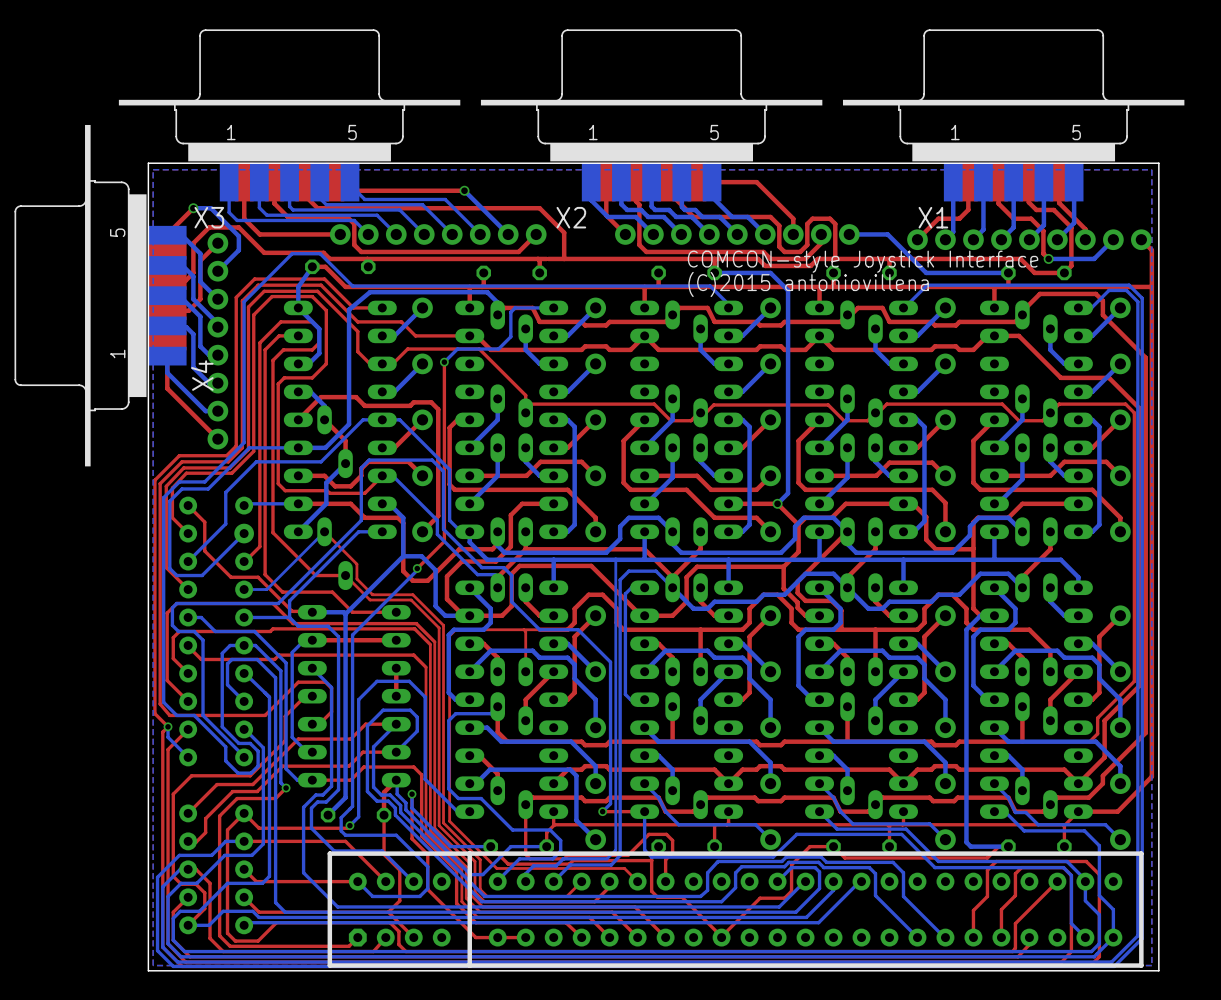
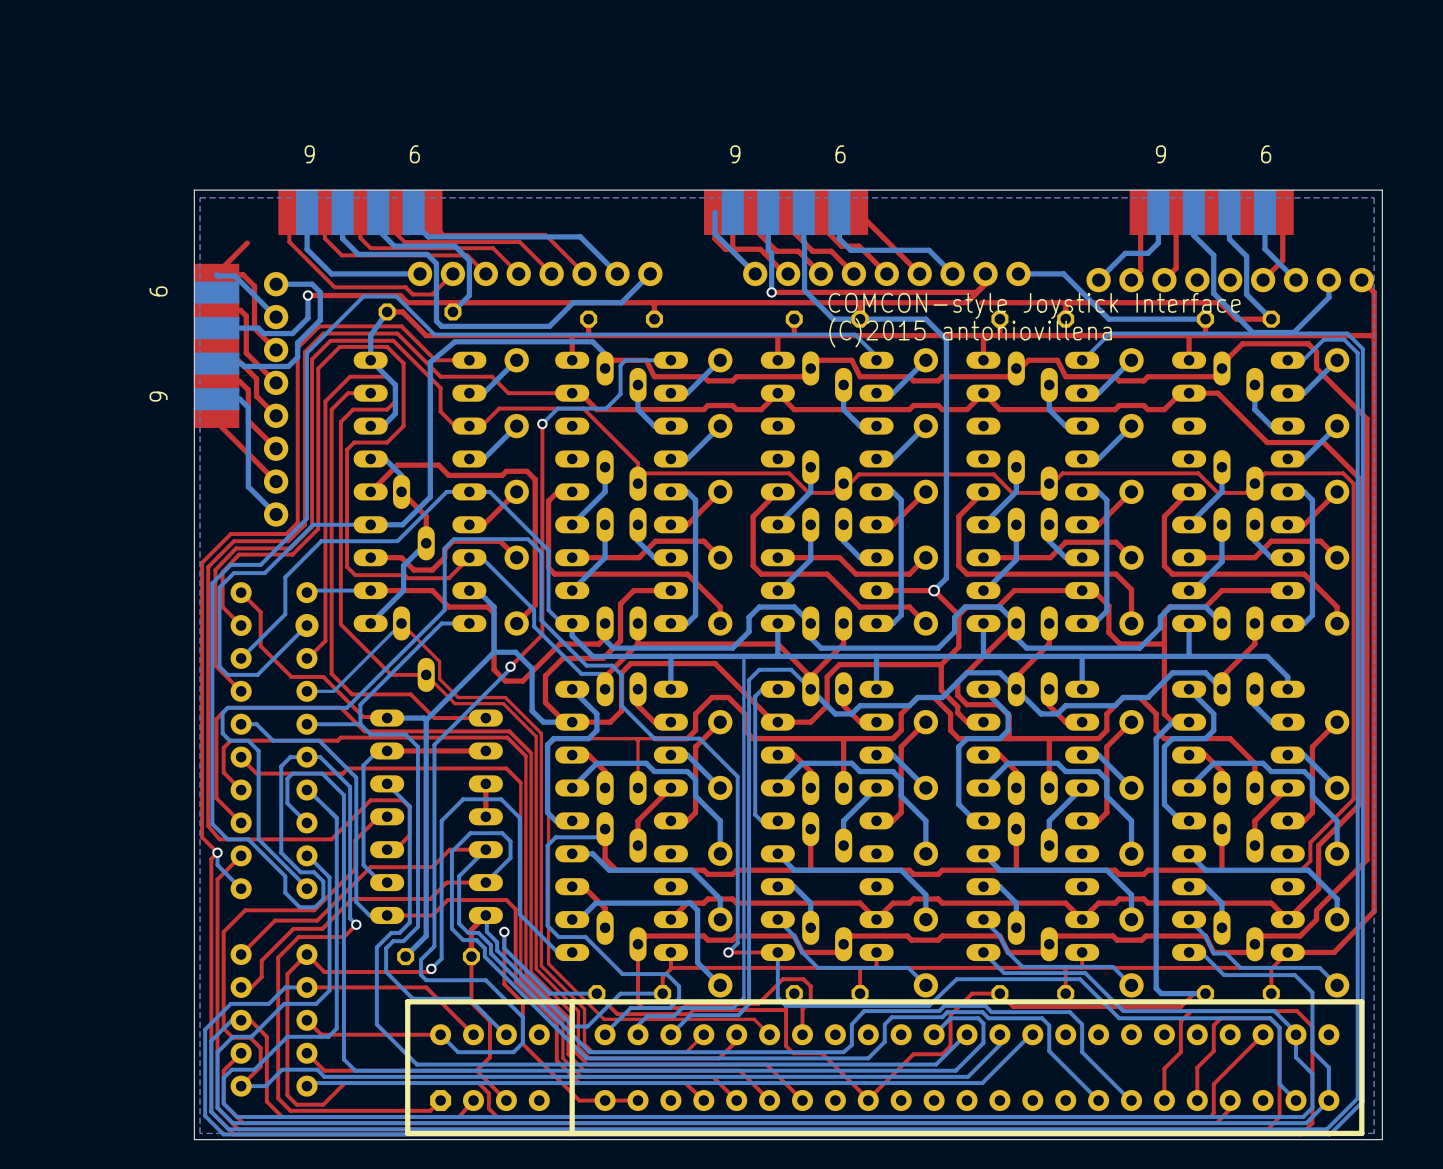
X3 side: bottom (289, 115) -> top (360, 212)
X2 side: bottom (651, 115) -> top (786, 212)
X1 side: bottom (1013, 115) -> top (1211, 212)
bottom track: (229, 182) (229, 212) (237, 220) (354, 220) (368, 234) -> none
top track: none -> (289, 212) (289, 241) (334, 287) (405, 287) (412, 294) (432, 294) (452, 273)
bottom track: none -> (307, 212) (307, 249) (331, 273) (420, 273)
top track: (244, 182) (244, 218) (259, 234) (340, 234) -> none
bottom track: (259, 182) (259, 207) (266, 215) (377, 215) (396, 234) -> none
top track: none -> (324, 212) (324, 238) (341, 255) (467, 255) (485, 273)
bottom track: none -> (342, 212) (342, 238) (358, 254) (427, 254) (436, 263) (436, 321) (441, 326) (549, 326) (573, 302) (621, 302) (650, 273)
top track: (274, 182) (274, 203) (287, 216) (347, 216) (354, 223) (354, 244) (361, 251) (518, 251) (536, 234) -> none
bottom track: (289, 182) (289, 206) (293, 209) (399, 209) (424, 234) -> none
top track: none -> (360, 212) (360, 237) (370, 248) (493, 248) (518, 273)
bottom track: none -> (378, 212) (378, 229) (394, 246) (455, 246) (469, 260) (469, 295) (452, 311)
top track: (304, 182) (304, 195) (317, 208) (539, 208) (564, 232) (564, 258) -> none
bottom track: (319, 182) (319, 198) (326, 204) (422, 204) (452, 234) -> none
top track: none -> (395, 212) (395, 233) (404, 242) (519, 242) (551, 273)
top track: (334, 182) (342, 182) (350, 190) (464, 190) -> none
bottom track: (350, 182) (350, 184) (364, 199) (445, 199) (480, 234) -> none
top track: none -> (431, 212) (431, 222) (443, 234) (545, 234) (584, 273)
top track: none -> (714, 212) (714, 238) (725, 249) (760, 249) (785, 273) (788, 273)
bottom track: (621, 182) (621, 204) (627, 209) (641, 209) (648, 216) (663, 216) (681, 234) -> none
top track: none -> (750, 212) (750, 225) (776, 251) (798, 251) (821, 273)
bottom track: none -> (768, 212) (768, 249) (771, 253) (771, 292)
top track: (636, 182) (635, 201) (639, 204) (639, 244) (646, 251) (763, 251) (770, 258) -> none
bottom track: (651, 182) (651, 206) (655, 209) (669, 209) (676, 216) (691, 216) (709, 234) -> none
top track: none -> (786, 212) (786, 224) (812, 251) (831, 251) (853, 273)
bottom track: none -> (803, 212) (804, 290) (833, 319) (860, 319)
top track: (666, 182) (666, 190) (693, 216) (770, 216) (779, 225) (779, 246) (784, 251) (800, 251) (807, 244) (807, 223) (812, 218) (830, 218) (835, 223) (835, 258) -> none
bottom track: (681, 182) (681, 206) (684, 209) (695, 209) (702, 216) (719, 216) (737, 234) -> none
top track: none -> (821, 212) (825, 230) (841, 246) (859, 246) (886, 273)
bottom track: none -> (839, 212) (839, 238) (850, 250) (928, 250) (952, 273)
bottom track: (712, 182) (712, 196) (732, 216) (747, 216) (765, 234) -> none
top track: (712, 182) (756, 182) (793, 218) (793, 234) -> (858, 212) (919, 273)
bottom track: (953, 182) (953, 231) (945, 239) -> none
top track: none -> (1140, 212) (1140, 270) (1131, 280)
bottom track: none -> (1158, 212) (1158, 242) (1147, 253) (1125, 253) (1098, 280)
top track: (968, 182) (968, 209) (959, 218) (938, 218) (917, 239) -> none
bottom track: (983, 182) (983, 229) (973, 239) -> none
top track: none -> (1176, 212) (1176, 268) (1164, 280)
top track: (998, 182) (998, 203) (1013, 218) (1031, 218) (1043, 230) (1043, 253) (1048, 258) -> none
bottom track: (1013, 182) (1013, 227) (1001, 239) -> none
bottom track: none -> (1229, 212) (1229, 239) (1246, 256) (1246, 294) (1271, 319)
top track: (1028, 182) (1028, 202) (1036, 209) (1053, 209) (1071, 227) (1071, 265) (1064, 272) -> none
bottom track: (1043, 182) (1043, 225) (1029, 239) -> none
bottom track: none -> (1265, 212) (1265, 249) (1296, 280)
top track: (1059, 182) (1059, 202) (1085, 229) (1085, 239) -> none
bottom track: (1074, 182) (1074, 222) (1057, 239) -> none
top track: none -> (1282, 212) (1282, 260) (1263, 280)
bottom track: (464, 190) (476, 202) -> (413, 212) (413, 222) (428, 236) (580, 236)
via: (464, 190) -> none
bottom track: (193, 208) (210, 208) (238, 236) (238, 250) (217, 271) -> none
via: (193, 208) -> none
bottom track: (607, 216) (635, 216) (653, 234) -> (734, 253) (755, 273)
top track: none -> (216, 274) (243, 274) (254, 286) (254, 328) (276, 350)
bottom track: (1113, 239) (1094, 258) (1048, 258) -> (1328, 280) (1328, 297) (1293, 332) (1252, 332) (1213, 293) (1213, 255) (1193, 235) (1193, 212)
top track: none -> (985, 283) (976, 292) (771, 292)
bottom track: none -> (276, 284) (312, 284) (320, 292) (320, 320) (297, 342) (297, 357) (288, 366) (244, 366) (241, 363) (216, 363)
top track: (217, 243) (200, 260) (200, 299) (188, 310) (167, 310) -> none
via: none -> (771, 292)
bottom track: none -> (307, 295) (307, 318) (292, 333) (263, 333) (258, 328) (216, 328)
via: none -> (307, 295)
top track: (264, 252) (238, 227) (209, 227) (193, 243) (193, 272) (185, 280) (167, 280) -> (330, 295) (307, 295)
bottom track: (200, 253) (200, 281) (217, 299) -> (255, 296) (276, 317)
top track: (817, 258) (810, 265) (765, 265) (758, 258) -> (925, 302) (911, 302)
via: (1048, 258) -> none
bottom track: (167, 265) (182, 265) (193, 276) (193, 299) (217, 323) (217, 327) -> none
top track: none -> (216, 310) (240, 310) (246, 316) (246, 353) (276, 382)
X4 side: bottom (100, 295) -> top (216, 345)
bottom track: (167, 295) (179, 295) (200, 316) (200, 346) (209, 355) (217, 355) -> none
top track: none -> (216, 345) (223, 345) (256, 378) (256, 396) (276, 415)
bottom track: (167, 325) (186, 327) (193, 334) (193, 367) (209, 383) (217, 383) -> none
top track: none -> (216, 381) (239, 381) (248, 390) (248, 420) (276, 448)
bottom track: none -> (216, 399) (239, 399) (248, 407) (248, 486) (276, 514)
bottom track: (167, 356) (167, 372) (205, 411) (217, 411) -> none
top track: (167, 360) (167, 388) (217, 439) -> (216, 422) (276, 481)

